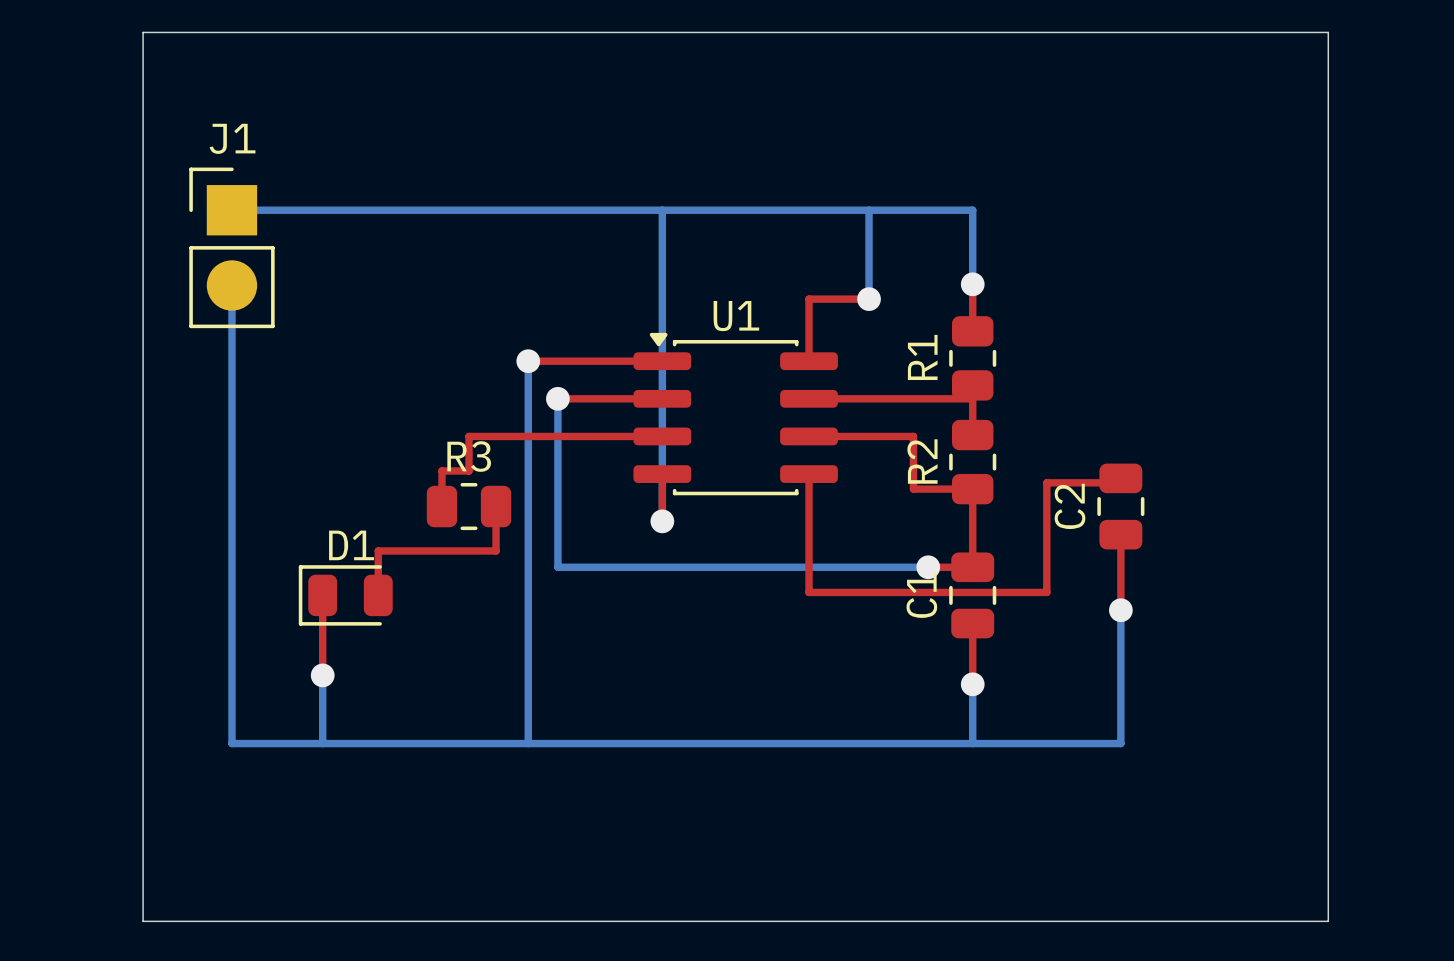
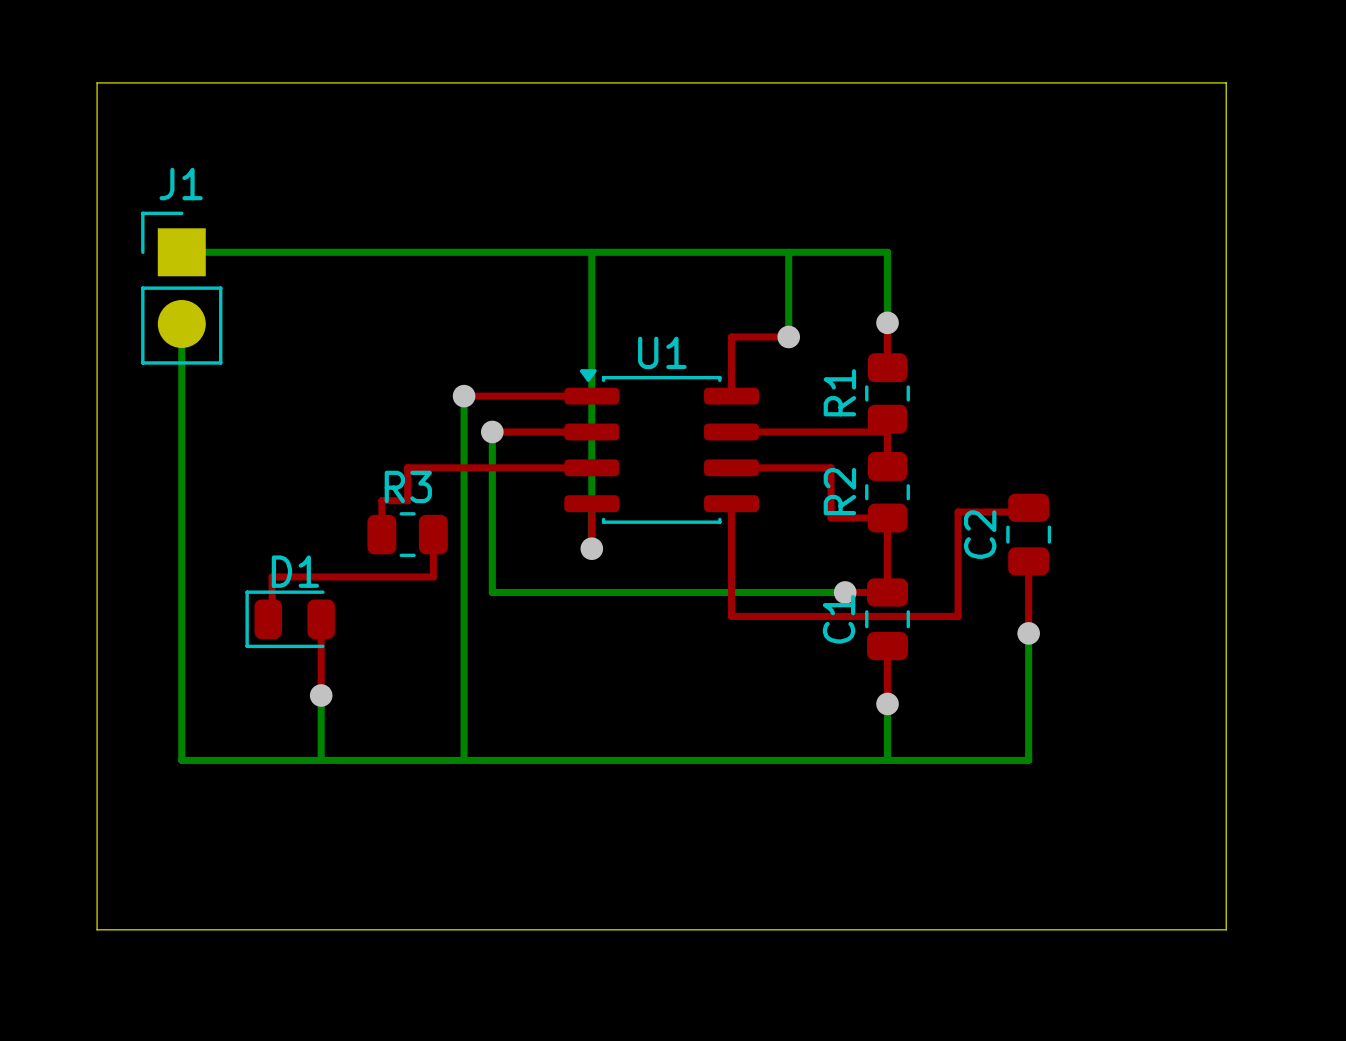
top track: (378, 550) (378, 592) -> (321, 576) (272, 576) (272, 616)
top track: (322, 610) (322, 675) -> (321, 633) (321, 695)
bottom track: (322, 675) (322, 743) -> (321, 695) (321, 760)
via position: (322, 675) -> (321, 695)

